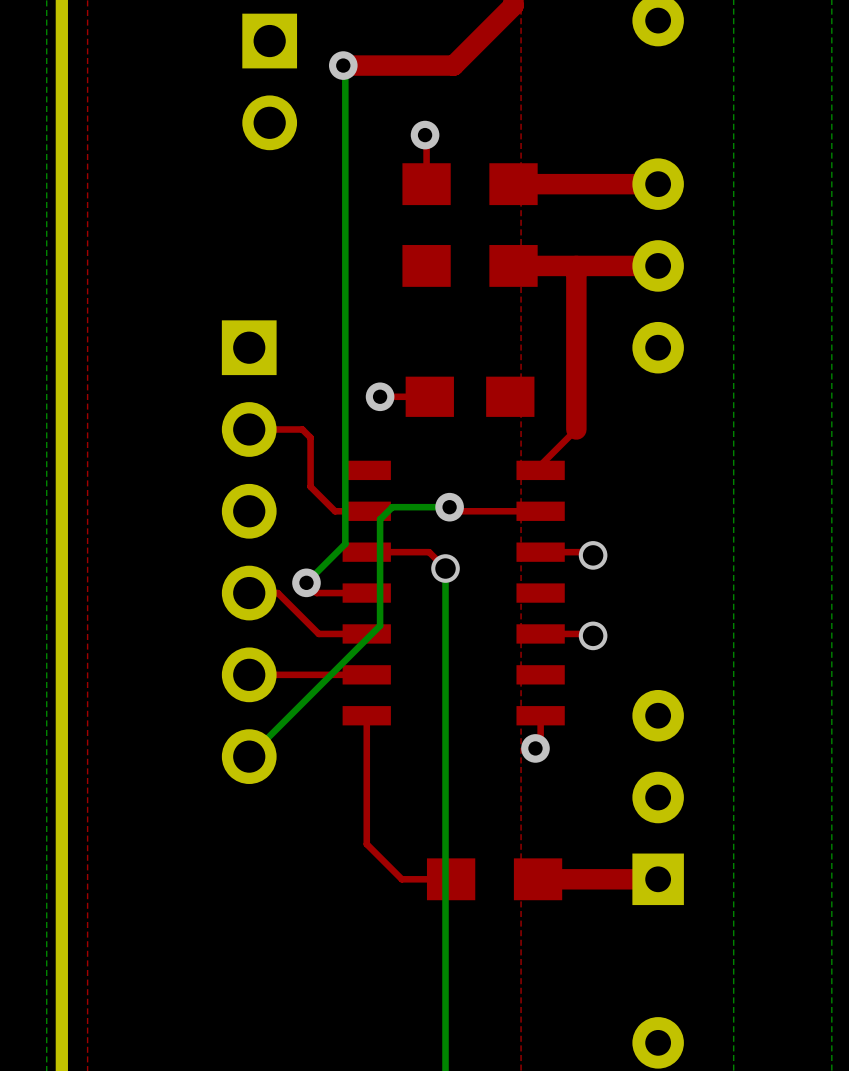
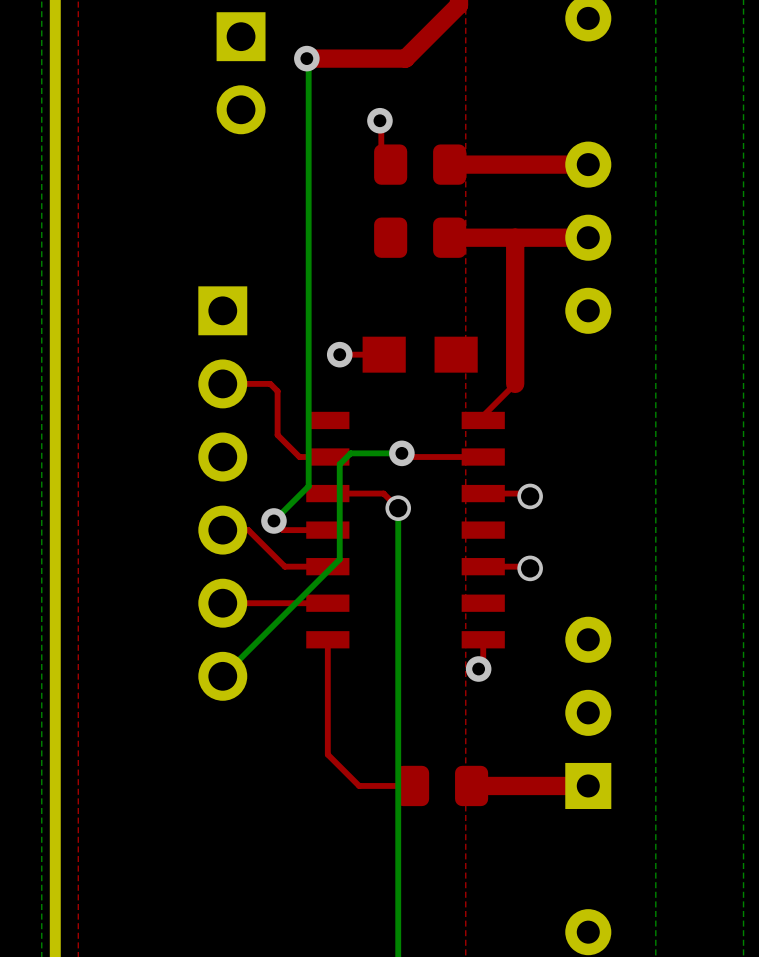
part footprint: [402, 163, 538, 206] -> [374, 144, 467, 185]
part footprint: [402, 245, 538, 287] -> [374, 217, 467, 258]
part footprint: [426, 858, 563, 901] -> [396, 765, 489, 807]

